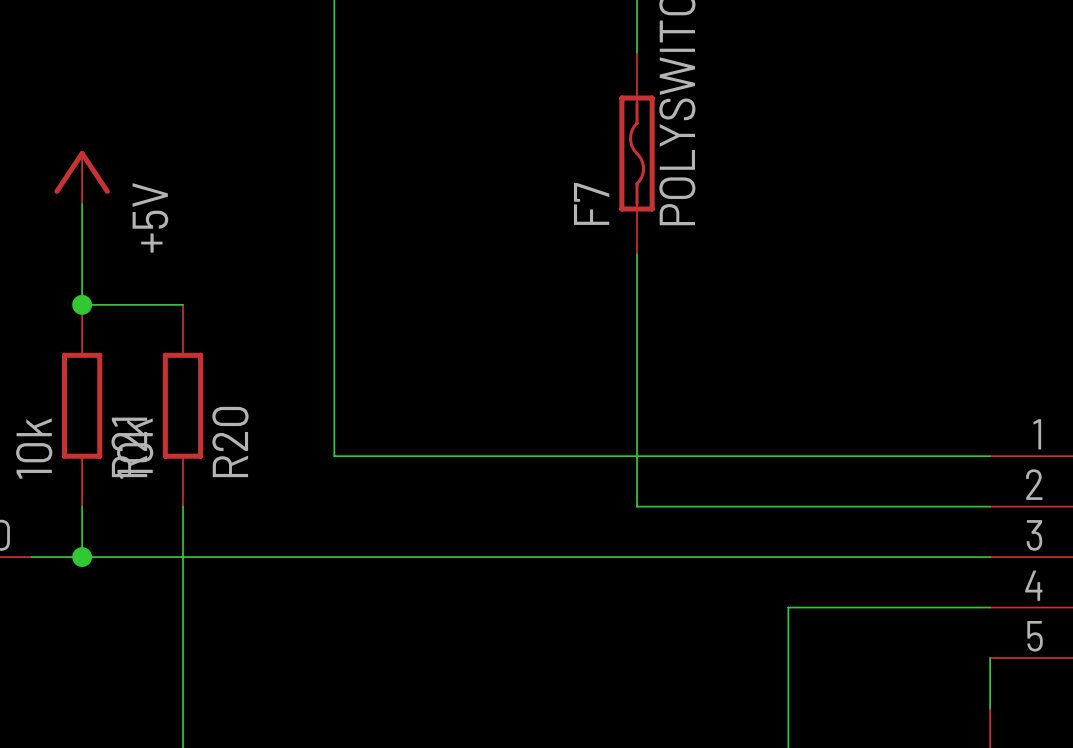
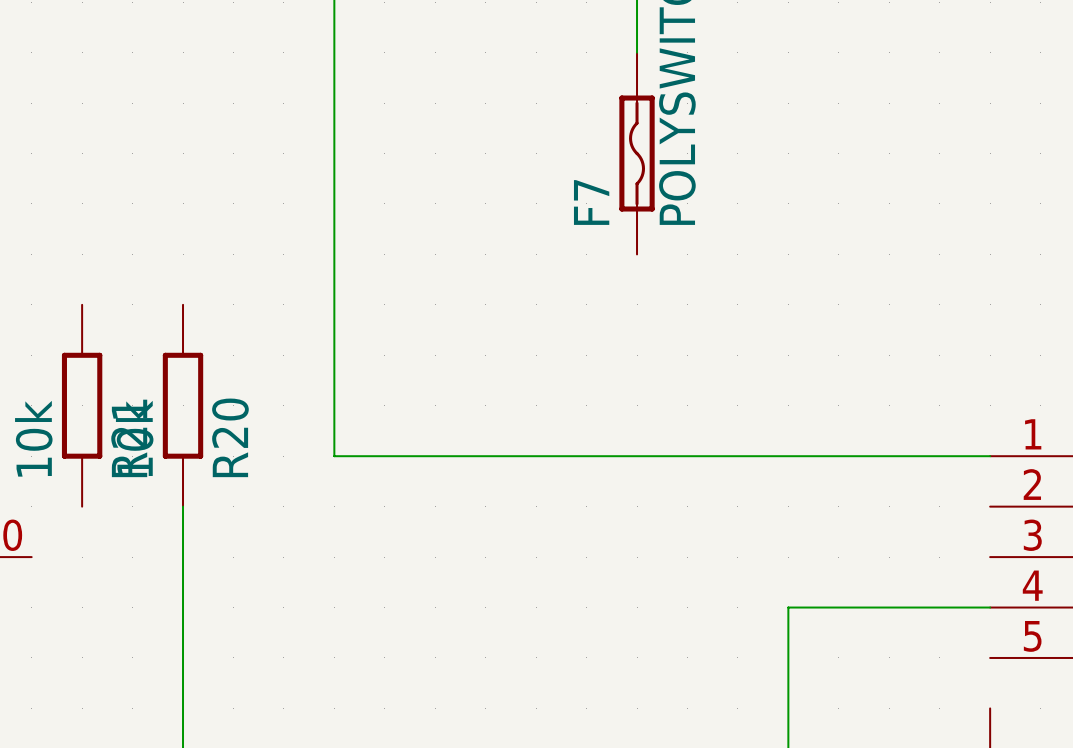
power symbol: +5V (82, 177) -> none
wire: (82, 203) (82, 304) (183, 304) -> none
wire: (637, 254) (637, 506) (990, 506) -> none
junction: (82, 304) -> none
wire: (82, 506) (82, 557) -> none
wire: (31, 557) (990, 557) -> none
junction: (82, 557) -> none
wire: (990, 657) (990, 708) -> none

